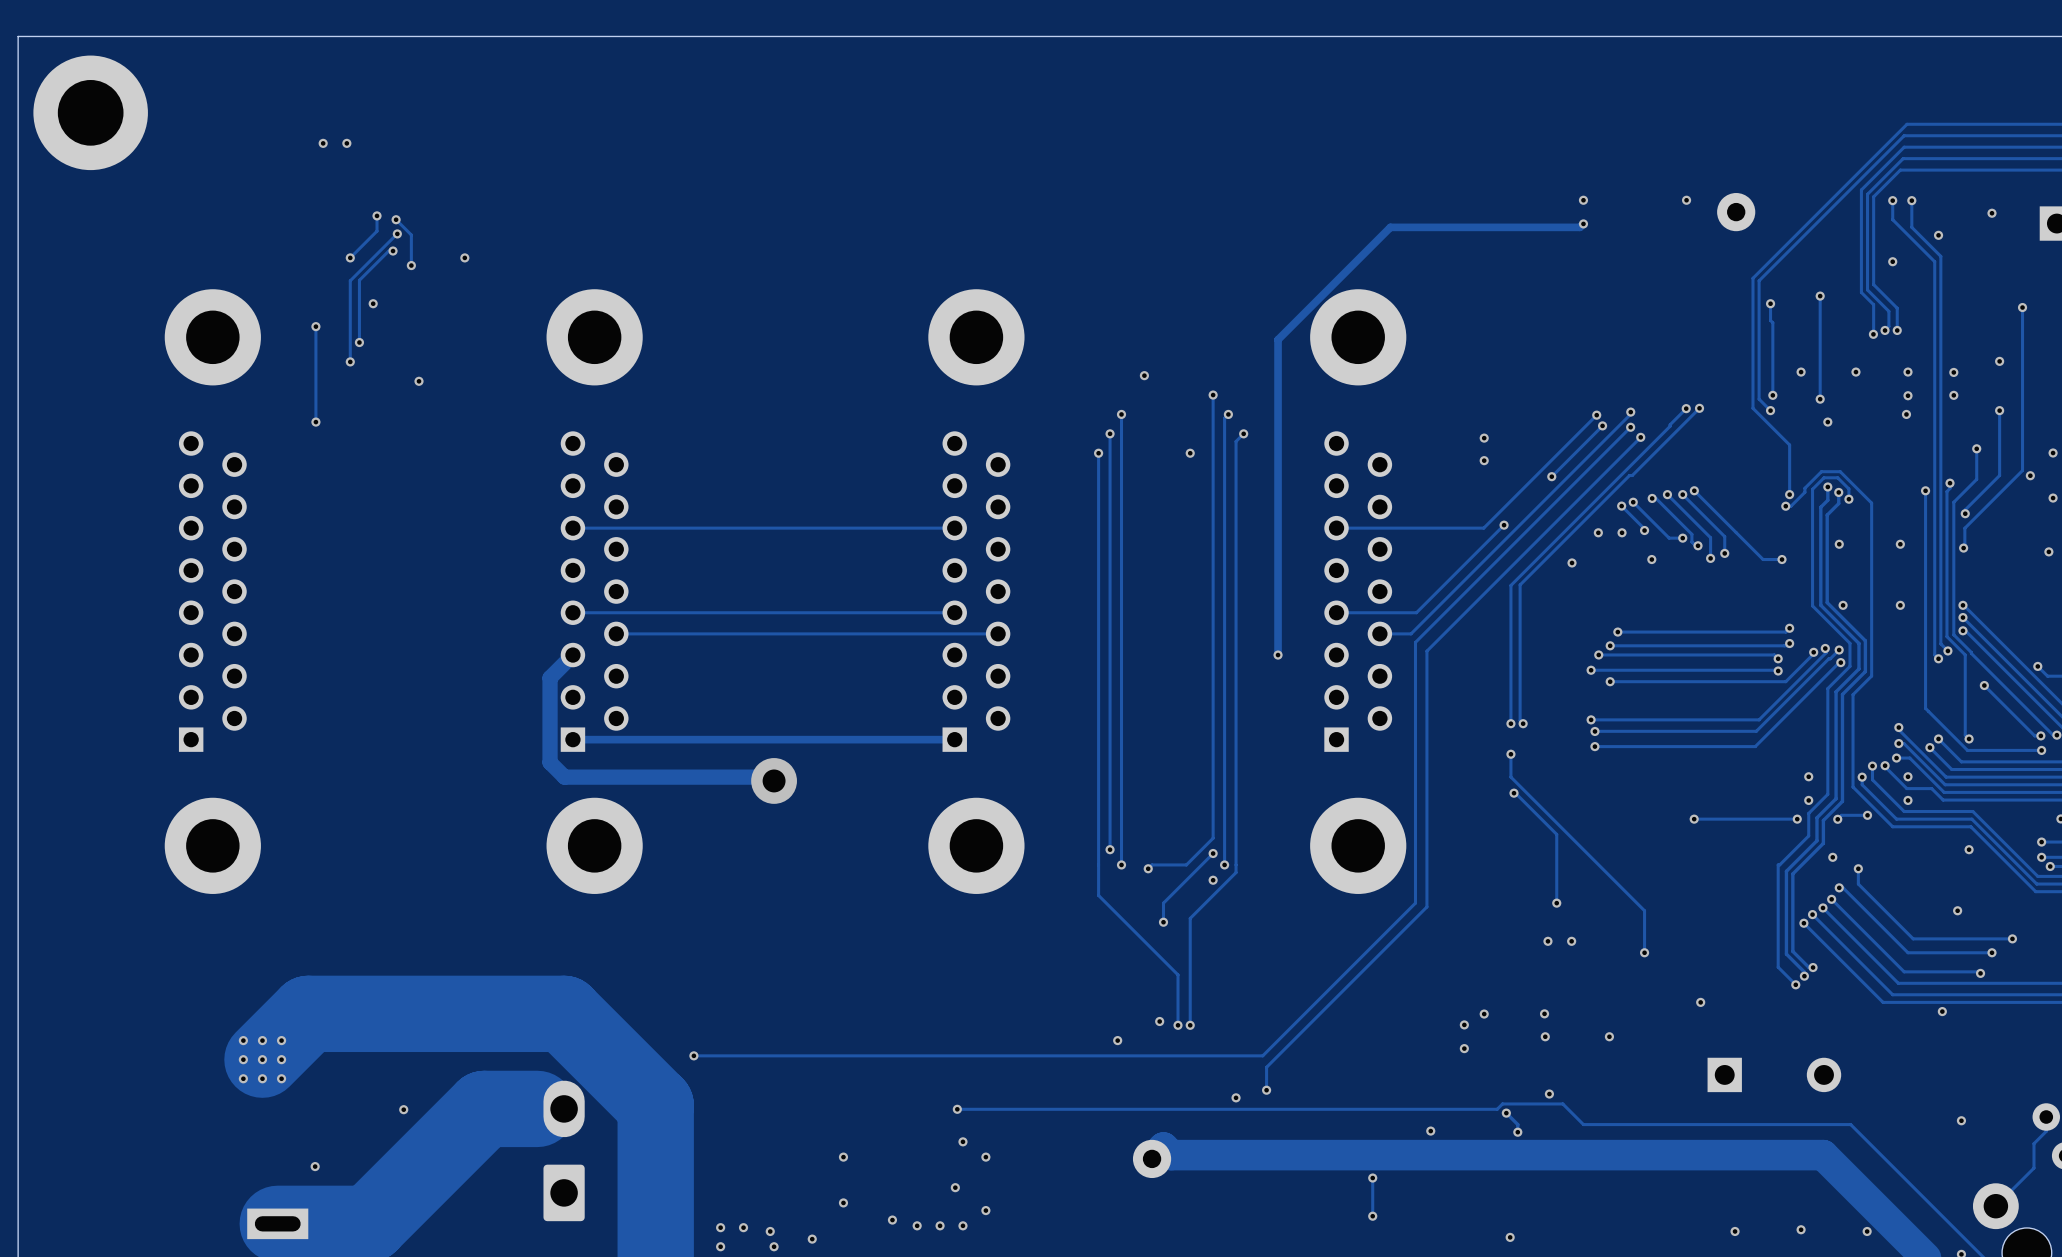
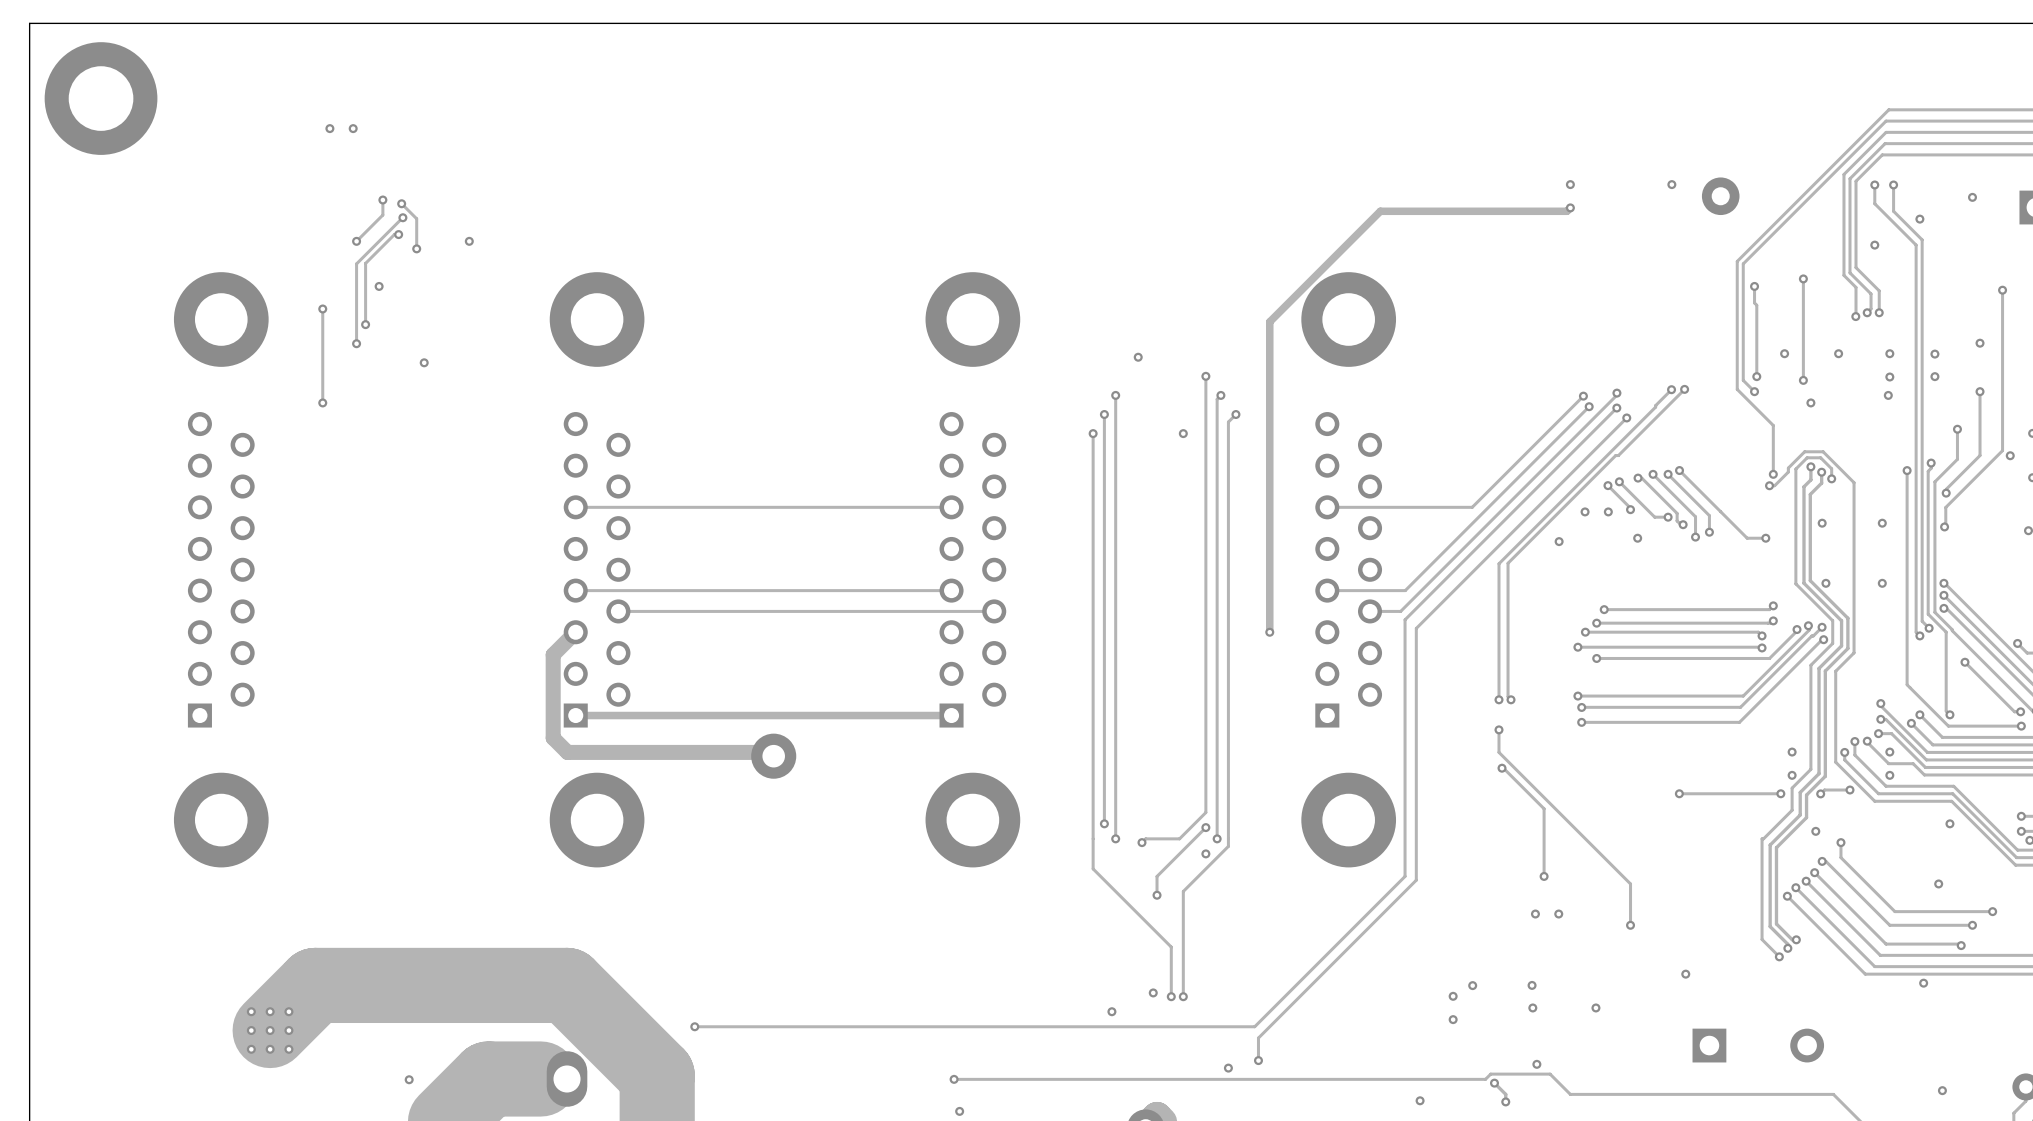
via: (1484, 438) -> none
via: (1484, 460) -> none
via: (1551, 476) -> none
track: (1504, 525) (1415, 612) -> (1539, 456) (1405, 590)
via: (1504, 525) -> none

